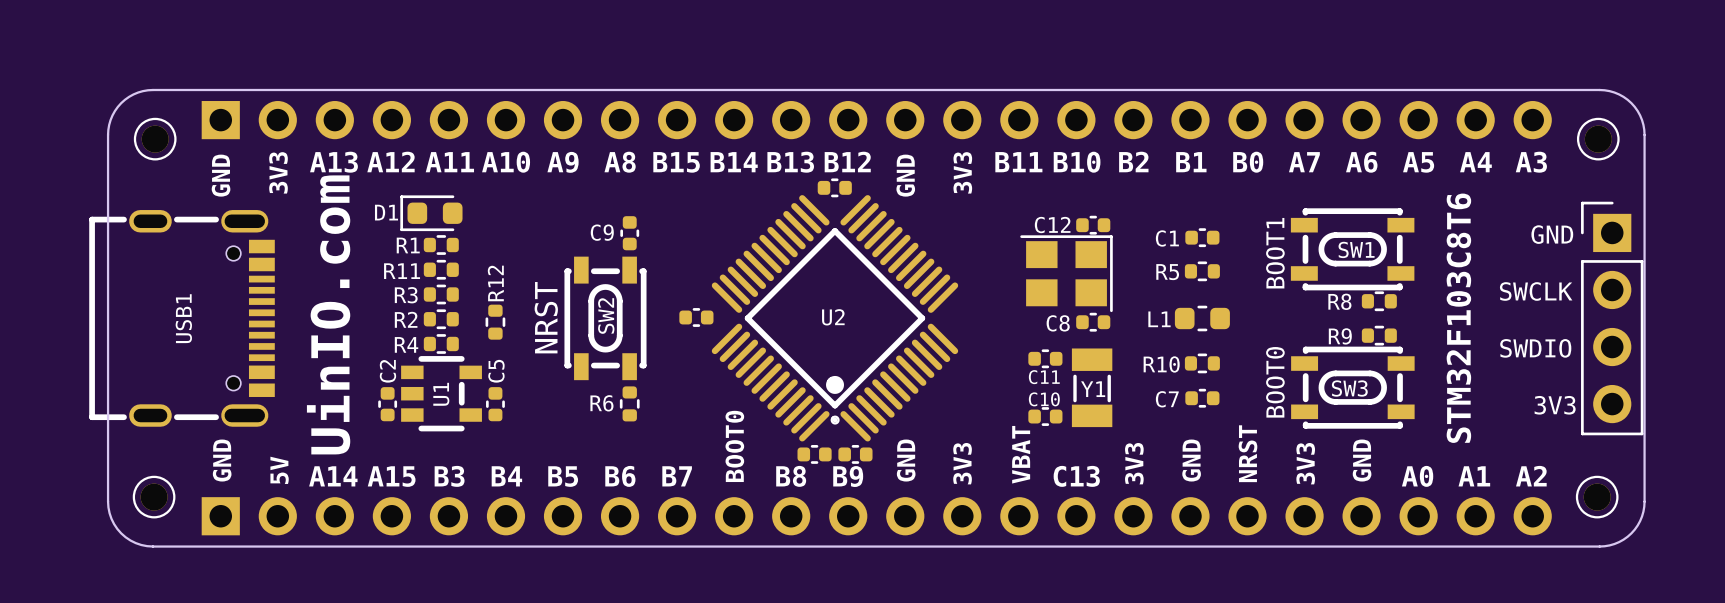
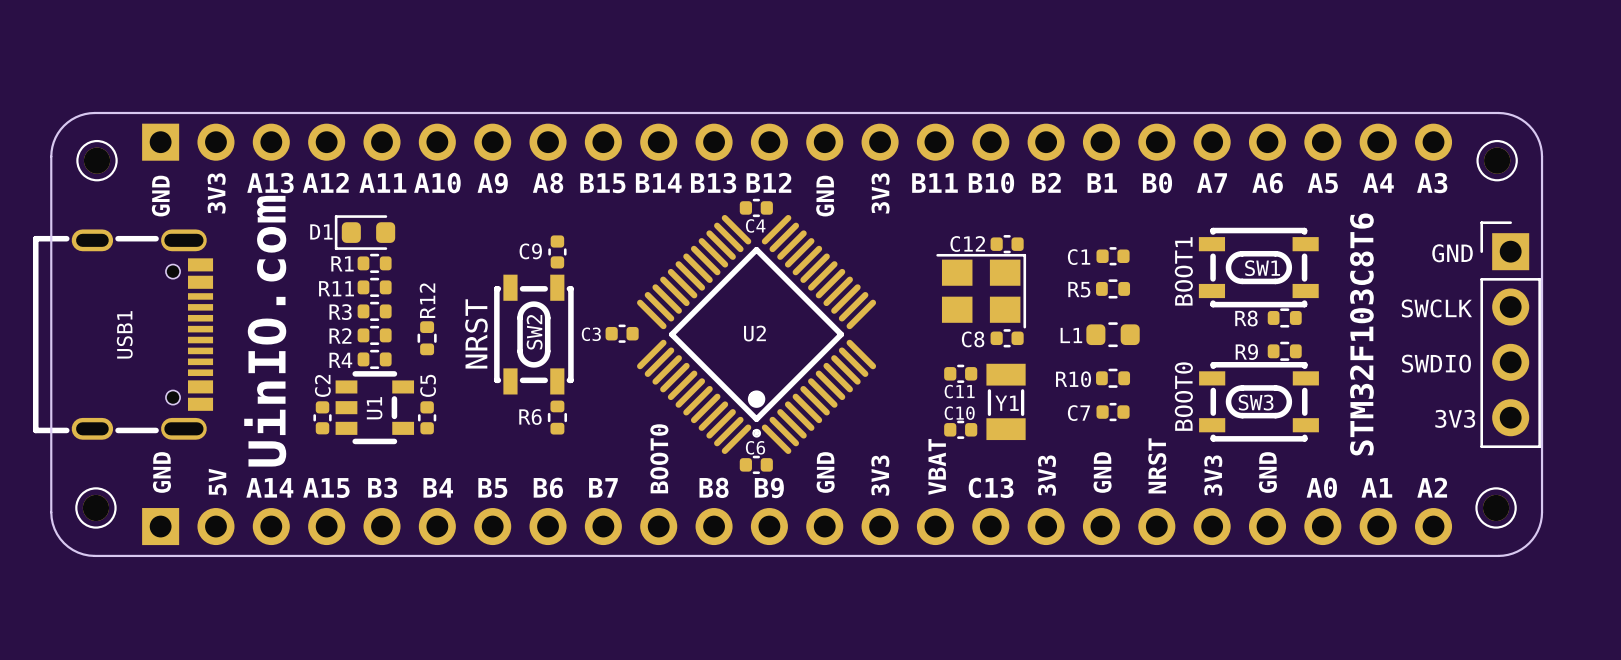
C4 name: none -> C4 (755, 225)
C3 name: none -> C3 (591, 334)
C6: none -> (756, 464)
part: (814, 454) -> none
part: (855, 454) -> none

